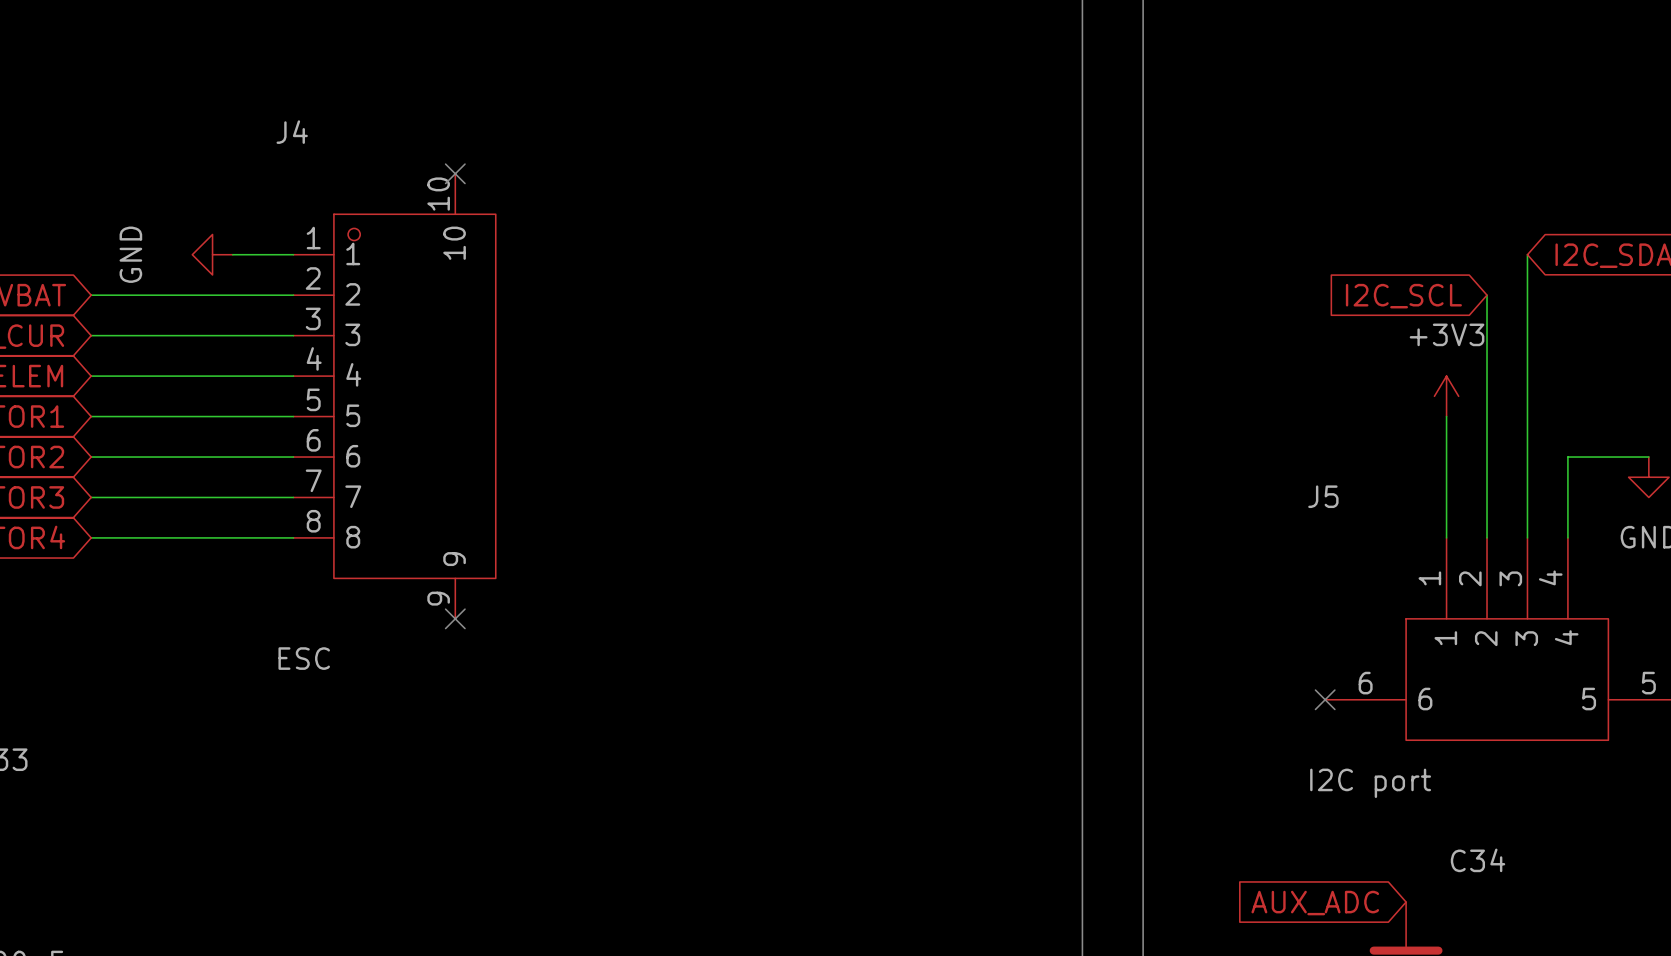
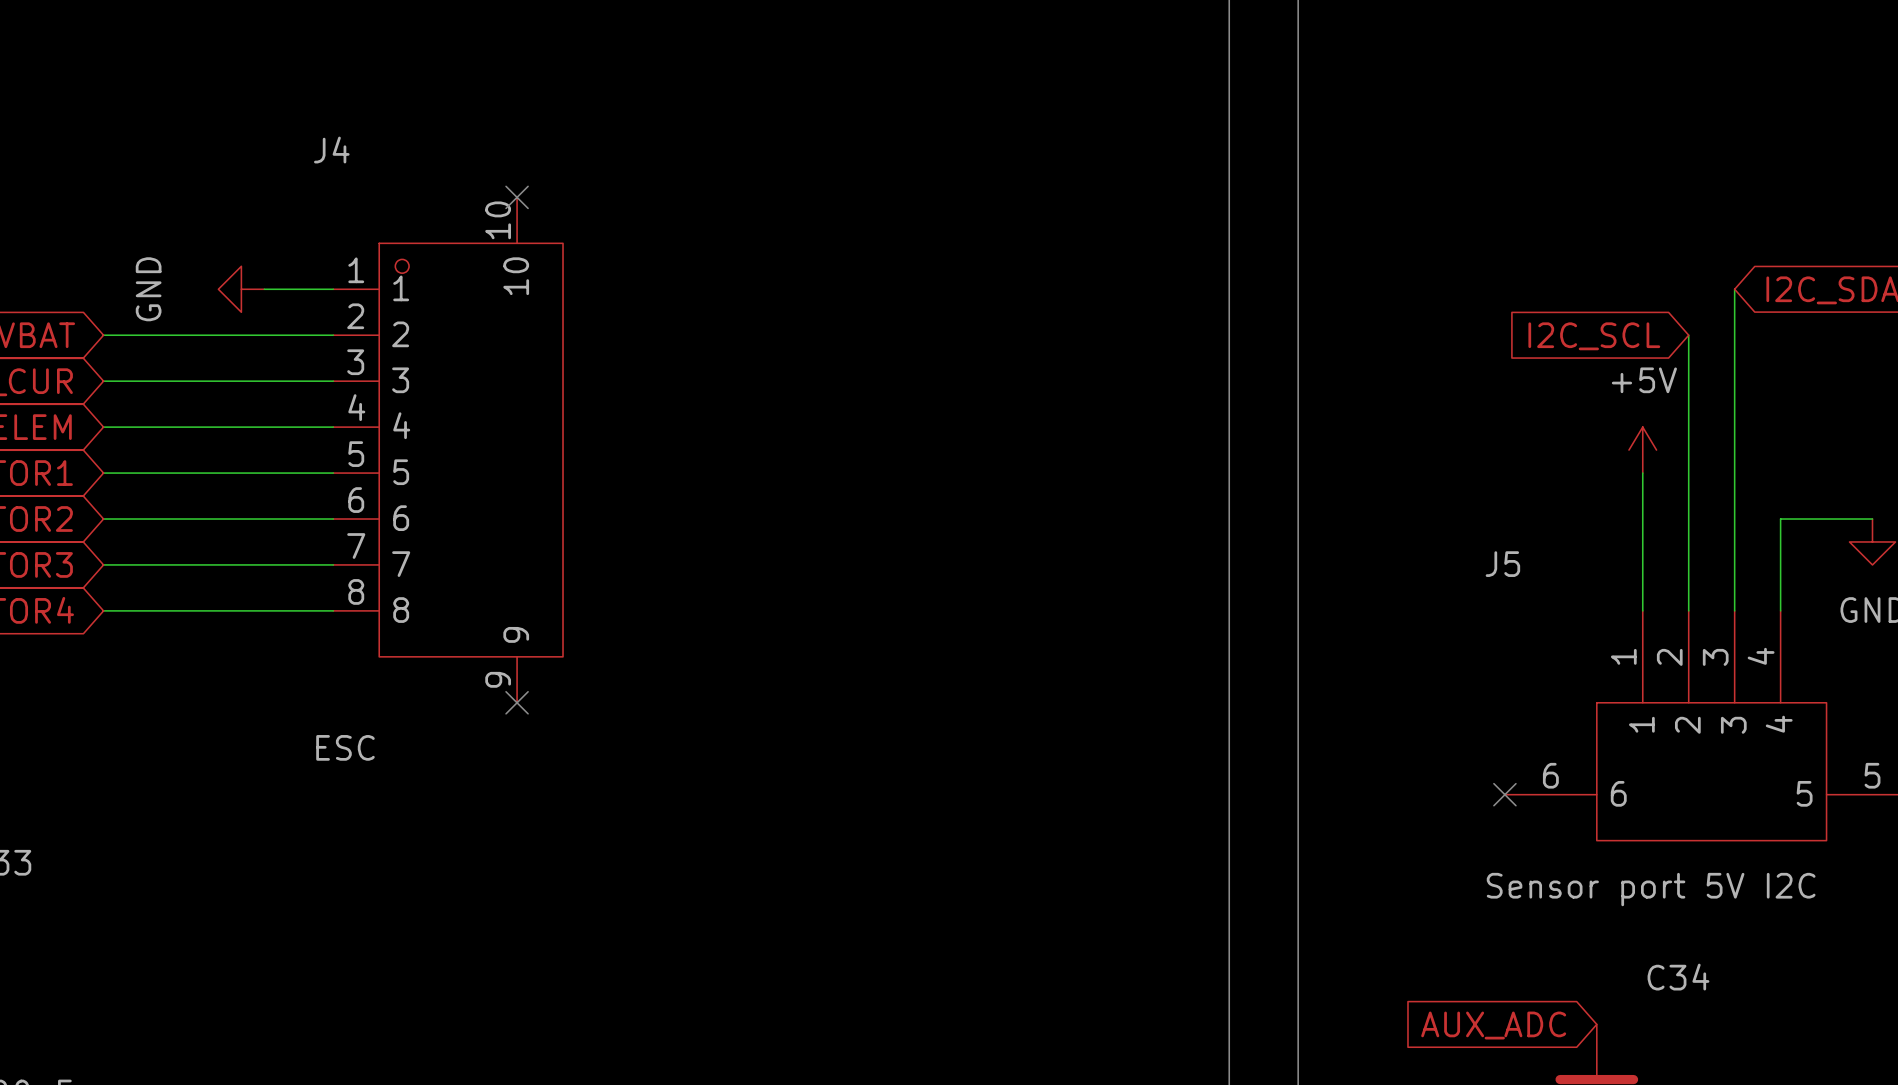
power symbol: +3V3 (1446, 396) -> +5V (1642, 450)
J5 value: I2C port (1370, 783) -> Sensor port 5V I2C (1651, 889)

